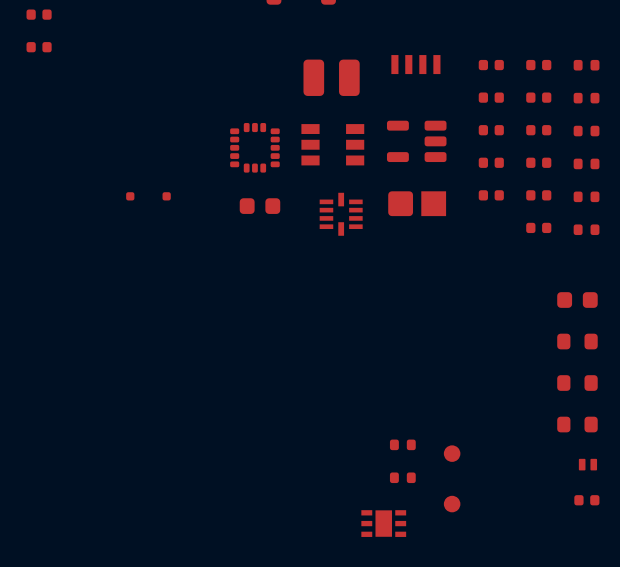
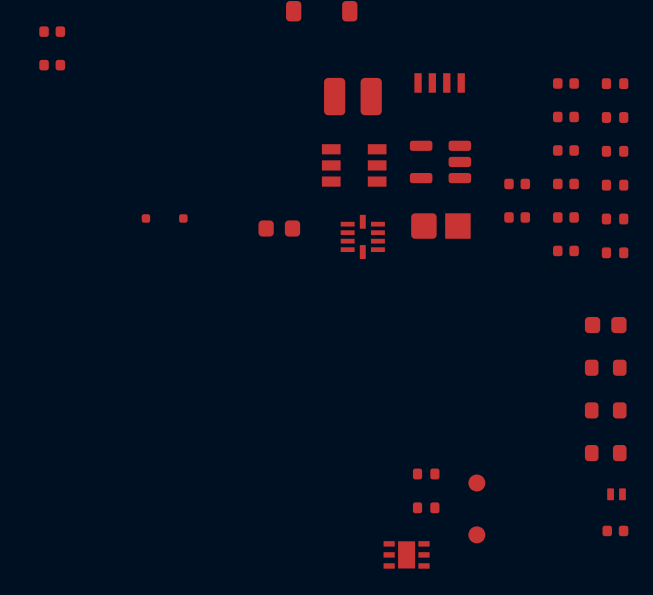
part: (491, 65) -> none
part: (491, 97) -> none
part: (491, 130) -> none
part: (254, 147) -> none

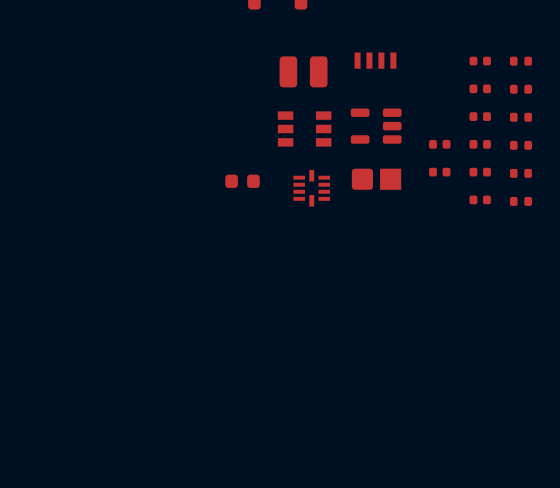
part: (52, 31) -> none
part: (52, 65) -> none
part: (164, 218) -> none
part: (605, 325) -> none
part: (605, 367) -> none
part: (605, 410) -> none
part: (605, 453) -> none
part: (426, 473) -> none
part: (476, 483) -> none
part: (616, 494) -> none
part: (426, 507) -> none
part: (615, 530) -> none
part: (476, 534) -> none
part: (406, 554) -> none

